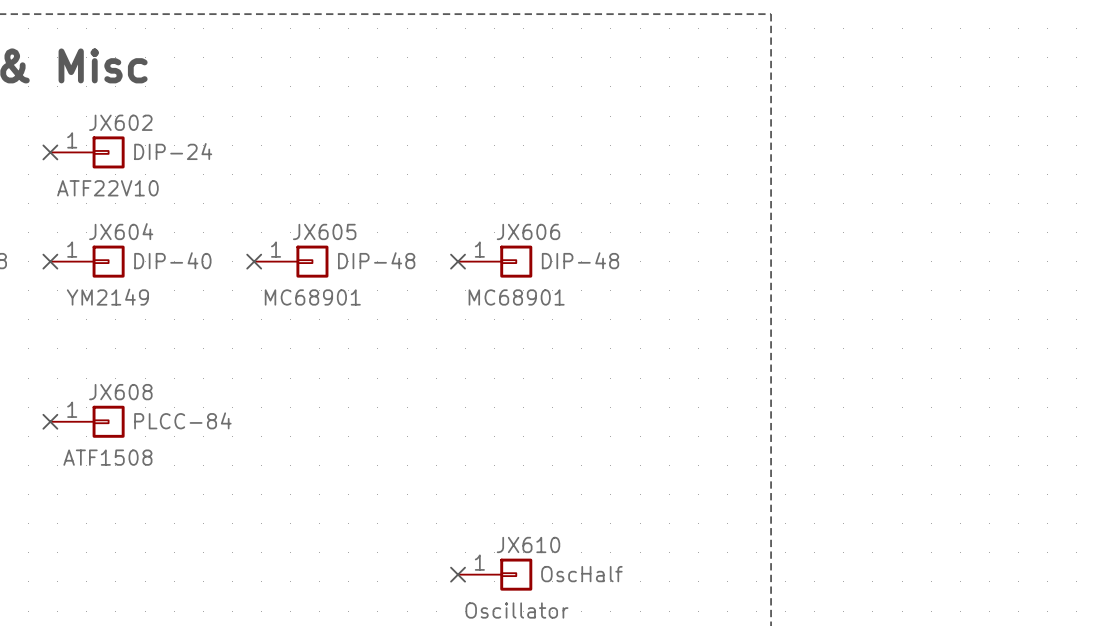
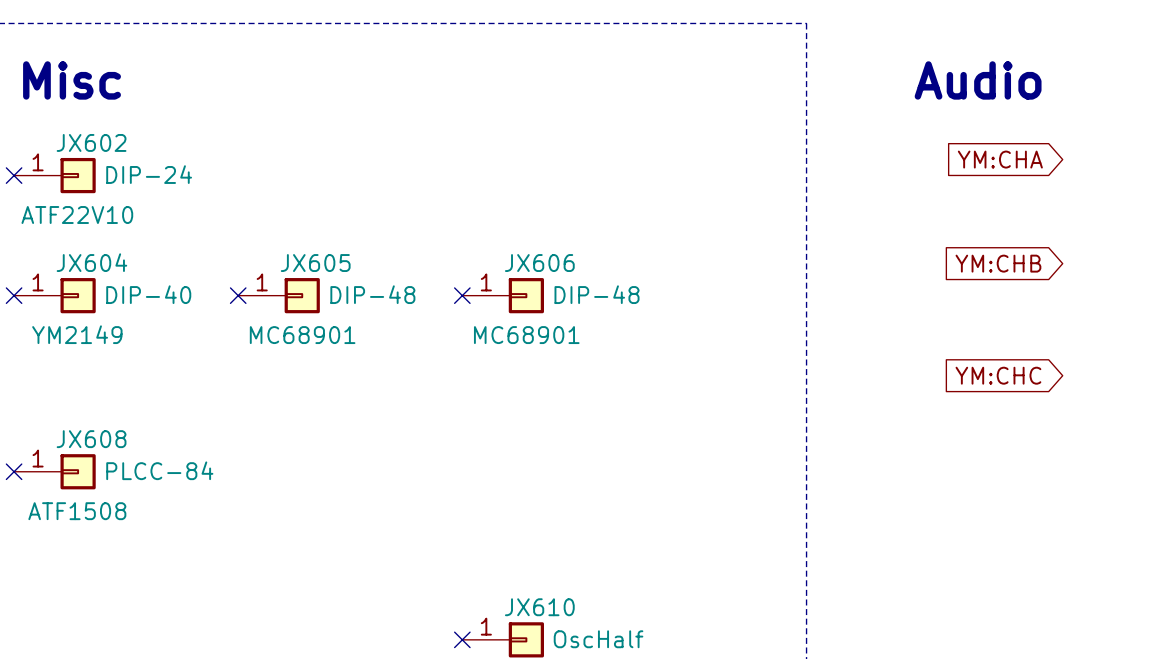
text: none -> Audio (978, 80)
global label: none -> YM:CHA (1000, 159)
global label: none -> YM:CHB (998, 263)
global label: none -> YM:CHC (998, 375)

